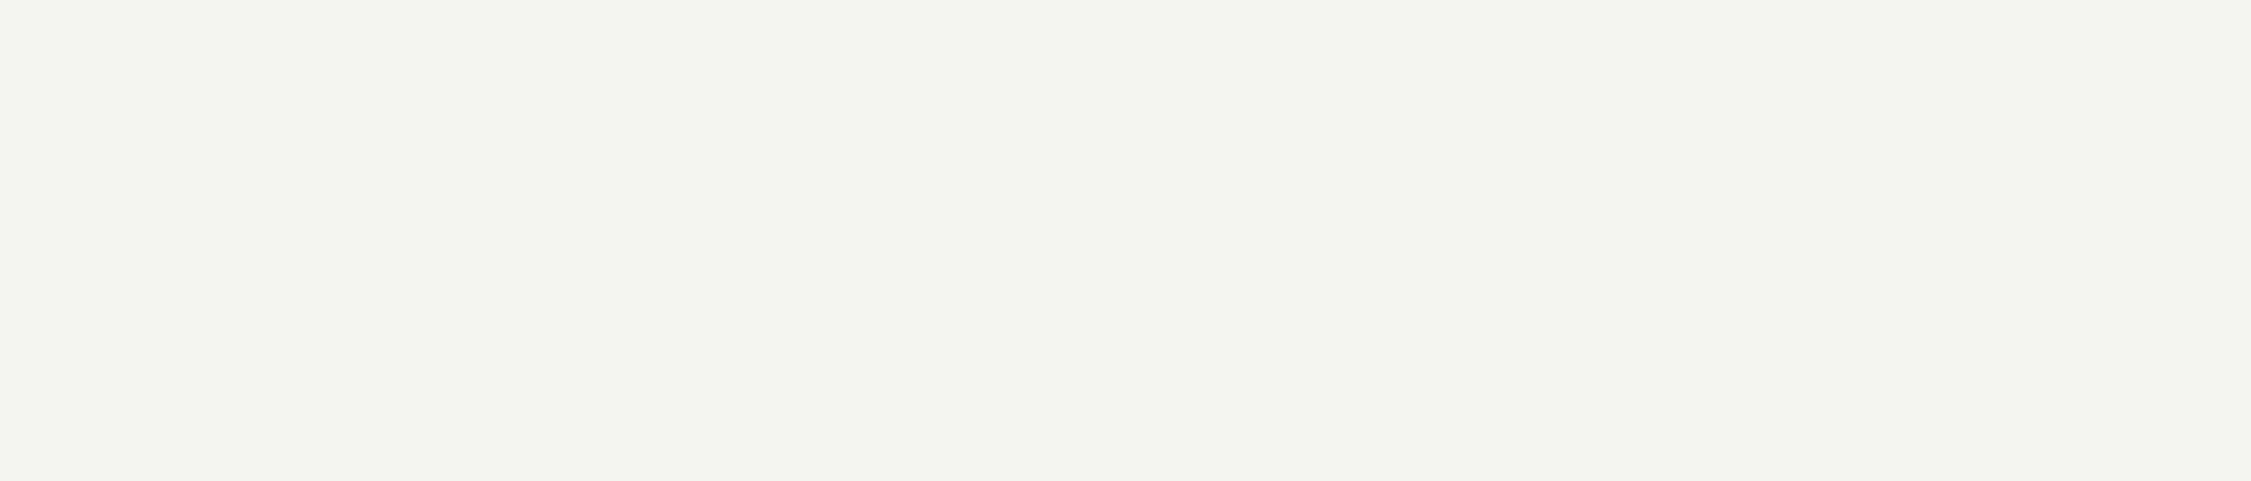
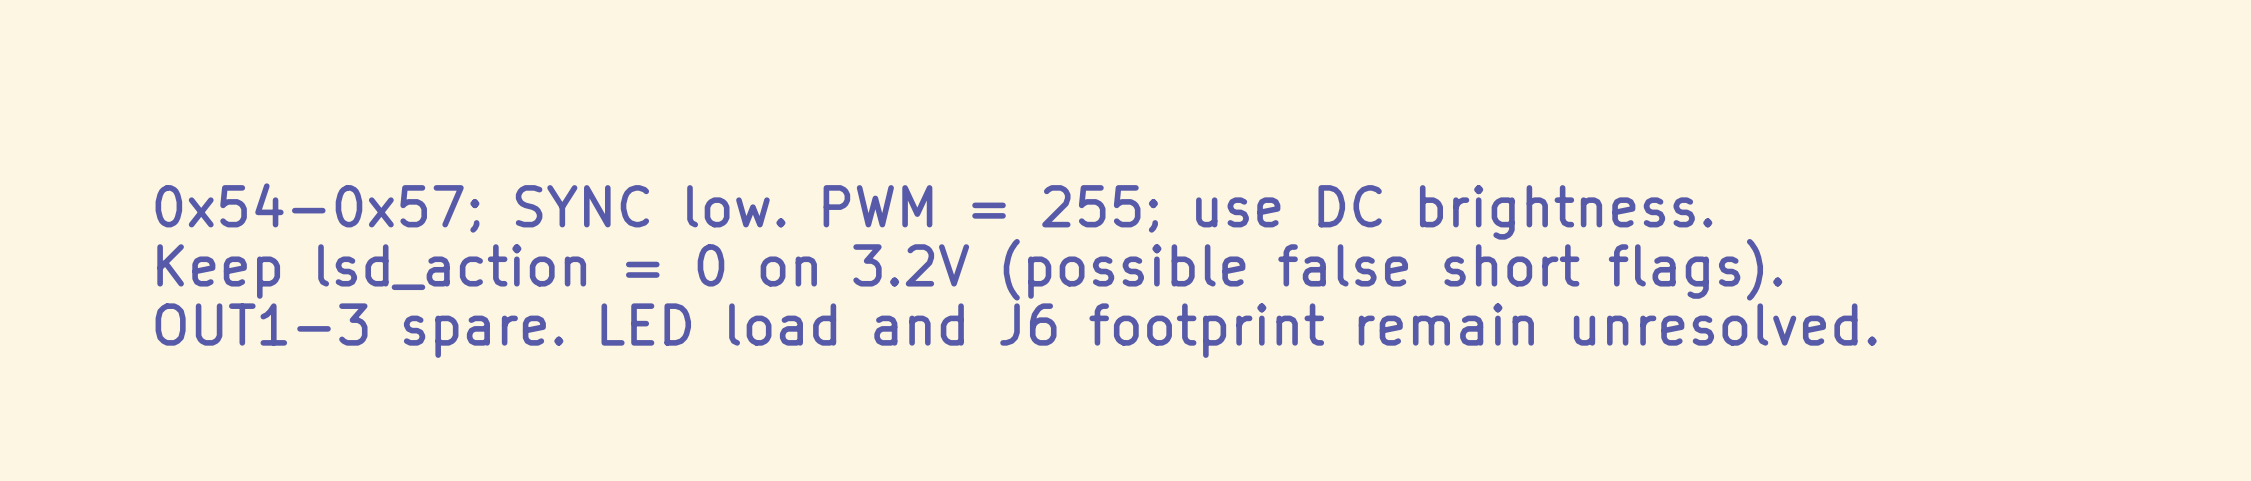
text: none -> 0x54-0x57; SYNC low. PWM = 255; use DC brightness. (933, 211)
text: none -> Keep lsd_action = 0 on 3.2V (possible false short flags). (969, 269)
text: none -> OUT1-3 spare. LED load and J6 footprint remain unresolved. (1016, 330)

